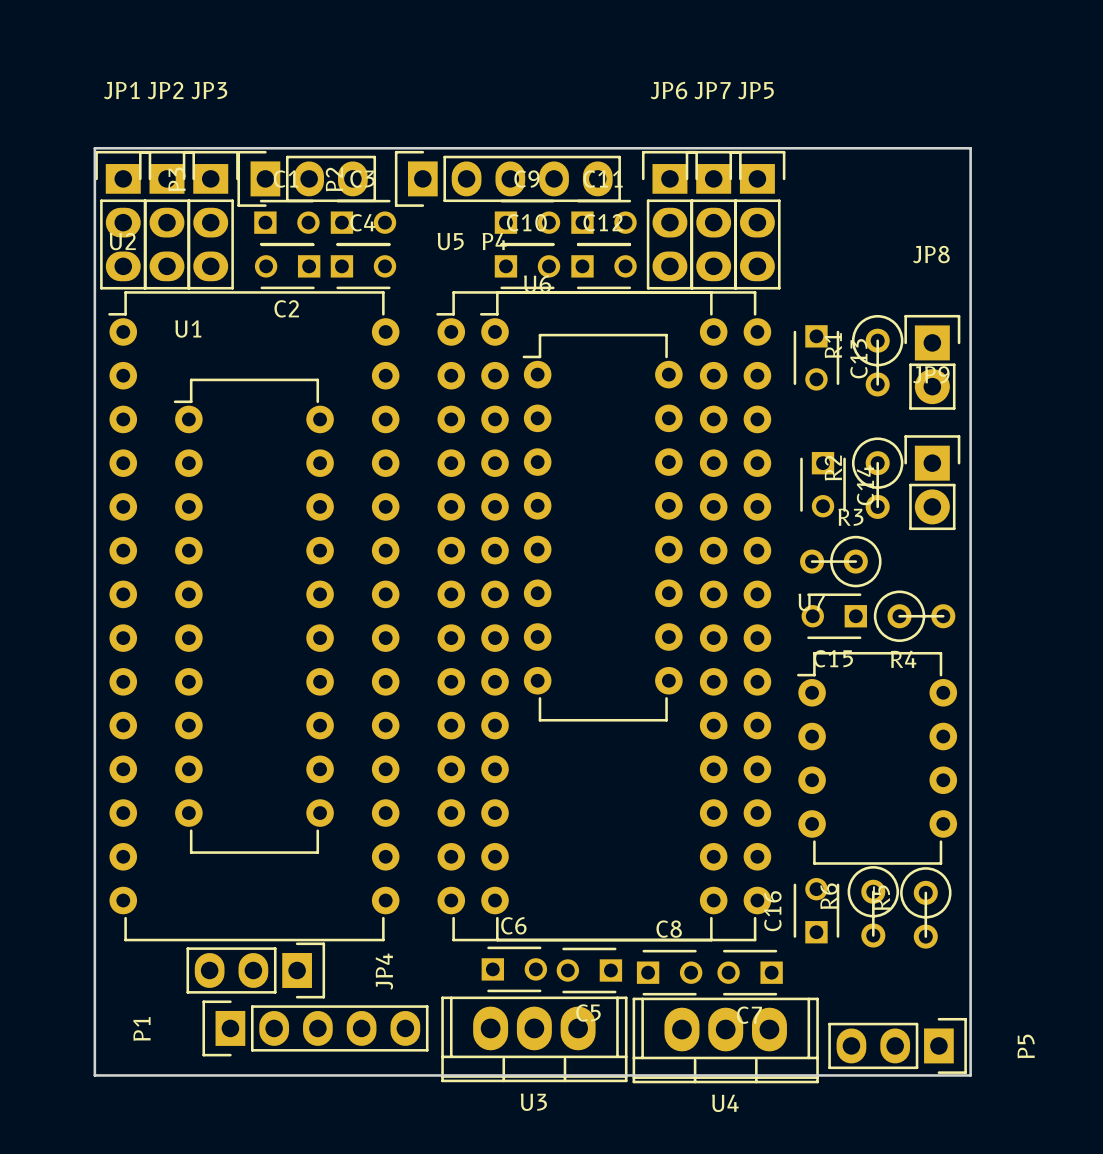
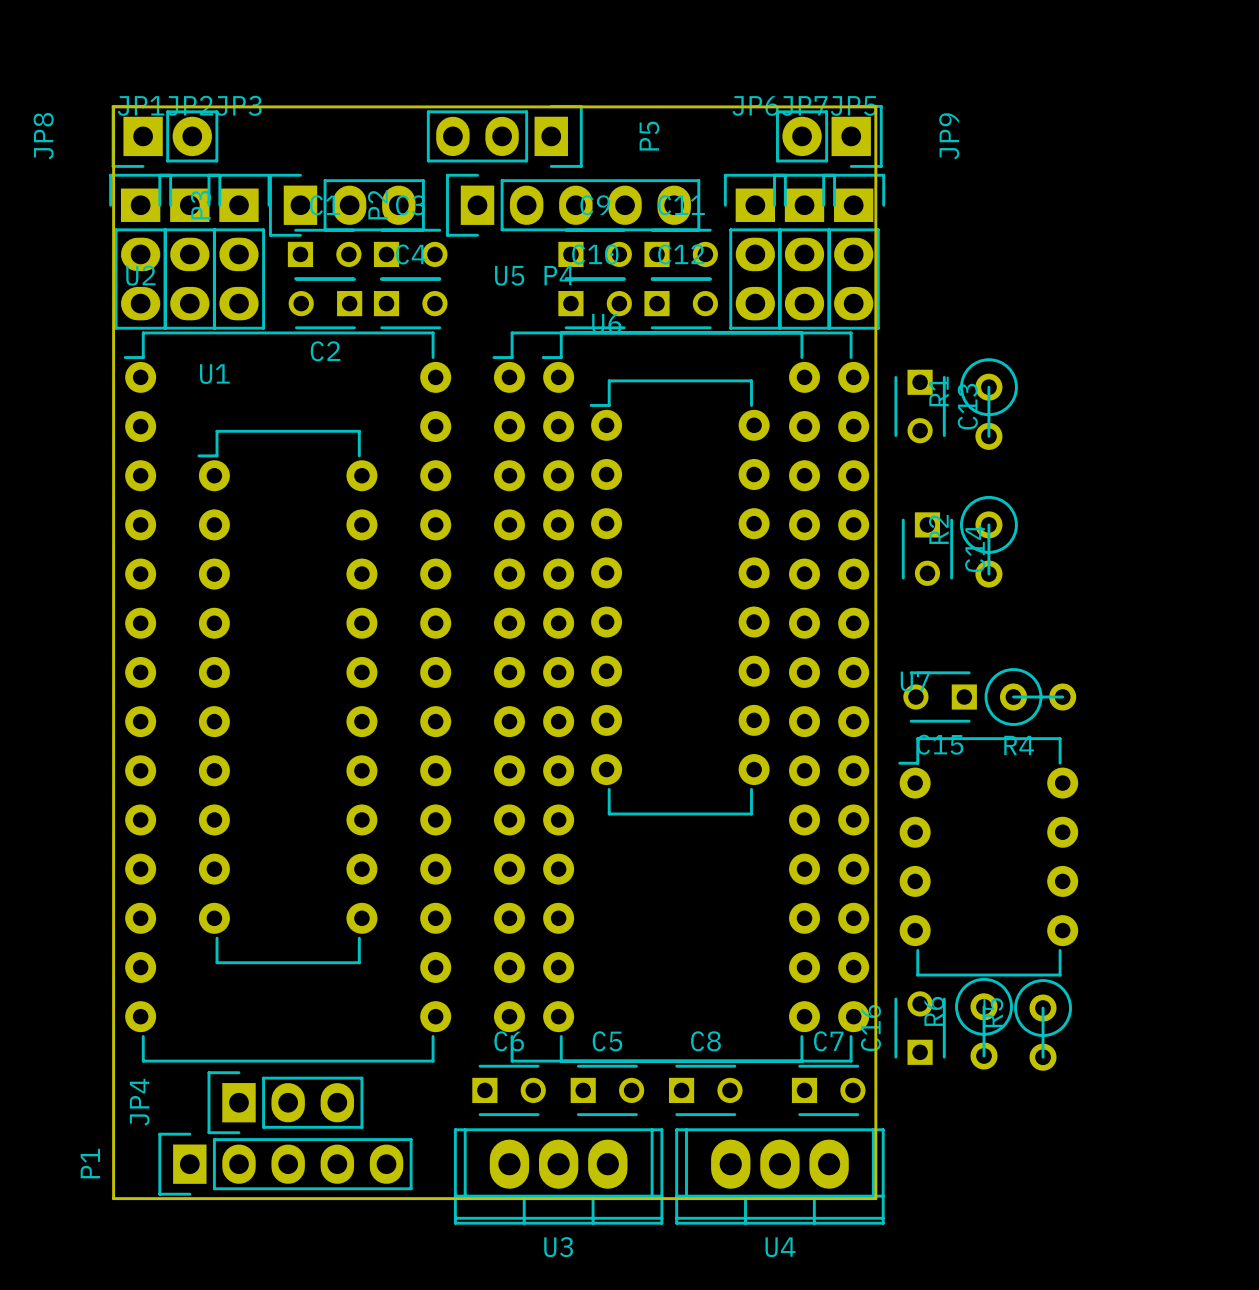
board edge: (94, 148) (970, 148) (970, 1075) (94, 1075) (94, 148) -> (113, 106) (113, 1198) (875, 1198) (875, 106) (113, 106)
JP8 rotation: 0° (932, 362) -> 90° counterclockwise (164, 136)
JP8 position: (932, 362) -> (164, 136)
JP9 rotation: 0° (932, 482) -> 90° clockwise (829, 136)
JP9 position: (932, 482) -> (829, 136)
R3: (840, 561) -> none
C6 position: (514, 969) -> (509, 1090)
JP4 rotation: 0° (255, 970) -> 180° (285, 1102)
C5 rotation: 0° (589, 970) -> 180° (607, 1090)
C5 position: (589, 970) -> (607, 1090)
C8 position: (669, 972) -> (705, 1090)
C7 rotation: 0° (750, 972) -> 180° (828, 1090)
U3 footprint: [441, 996, 628, 1083] -> [453, 1128, 664, 1225]
P1 position: (315, 1028) -> (285, 1164)
U4 position: (725, 1040) -> (779, 1176)
P5 position: (897, 1045) -> (504, 136)

